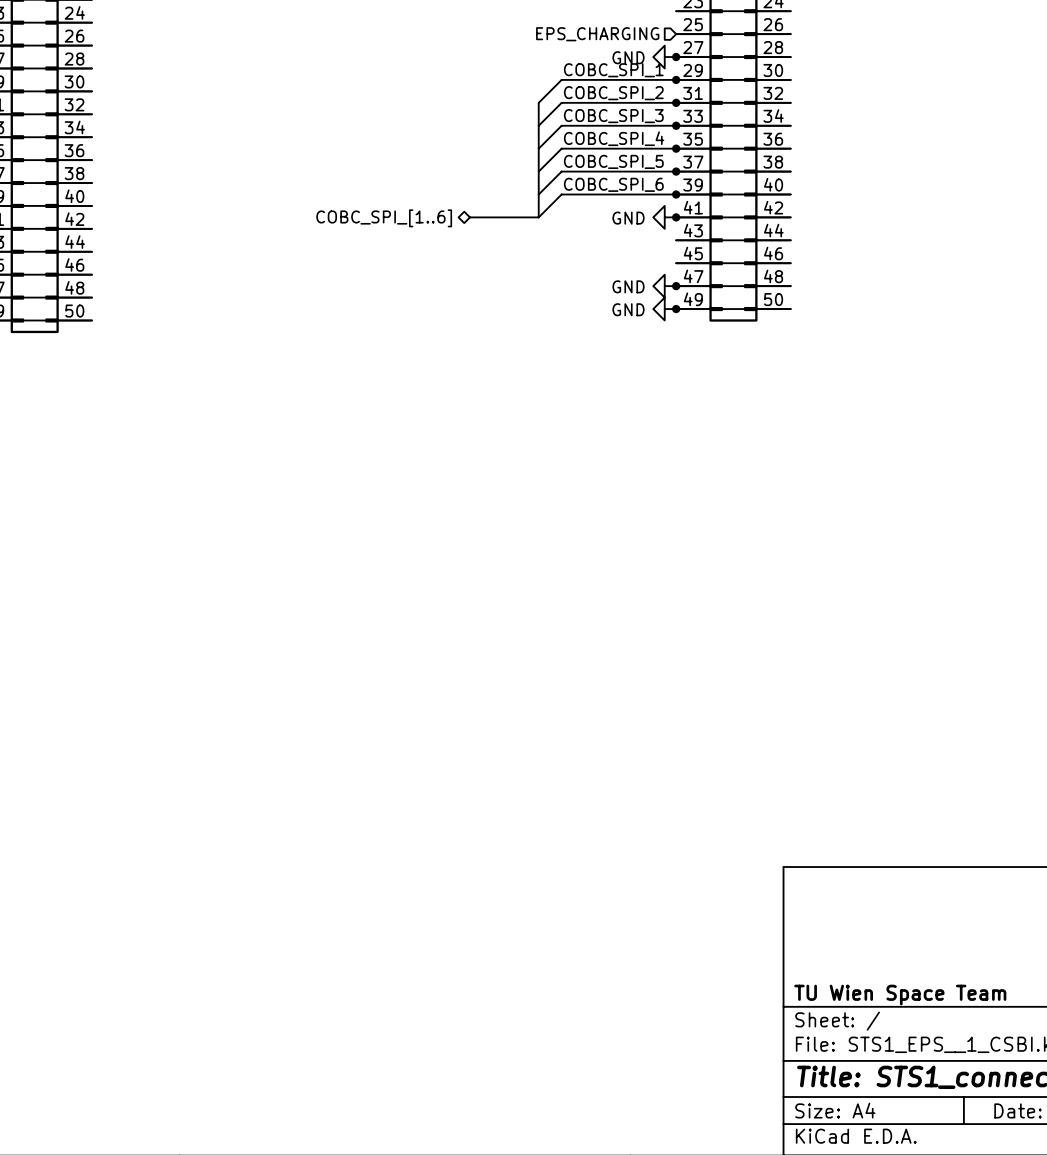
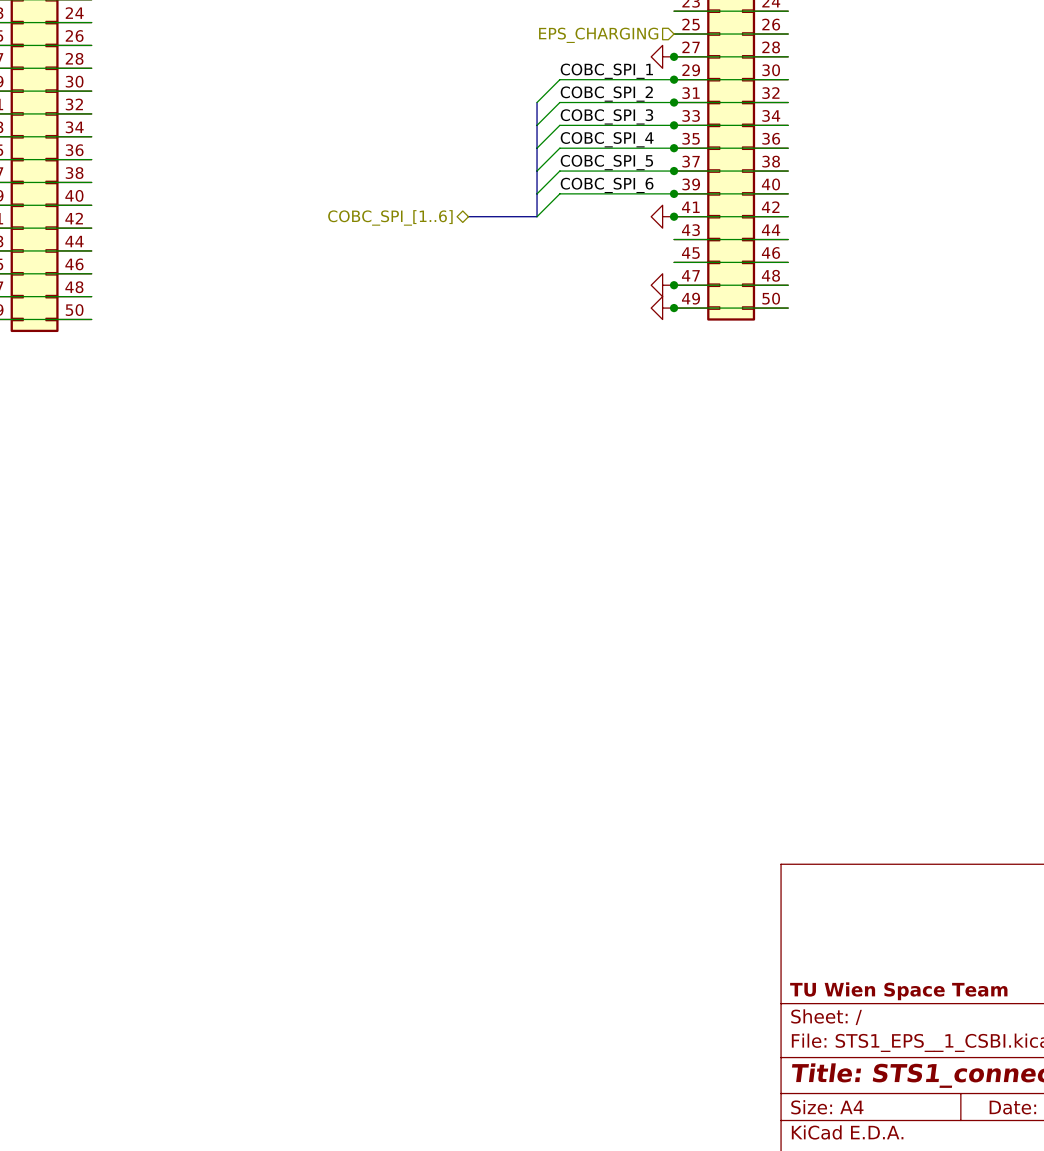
power symbol text: GND (628, 57) -> none
power symbol text: GND (628, 218) -> none
power symbol text: GND (628, 286) -> none
power symbol text: GND (628, 309) -> none

